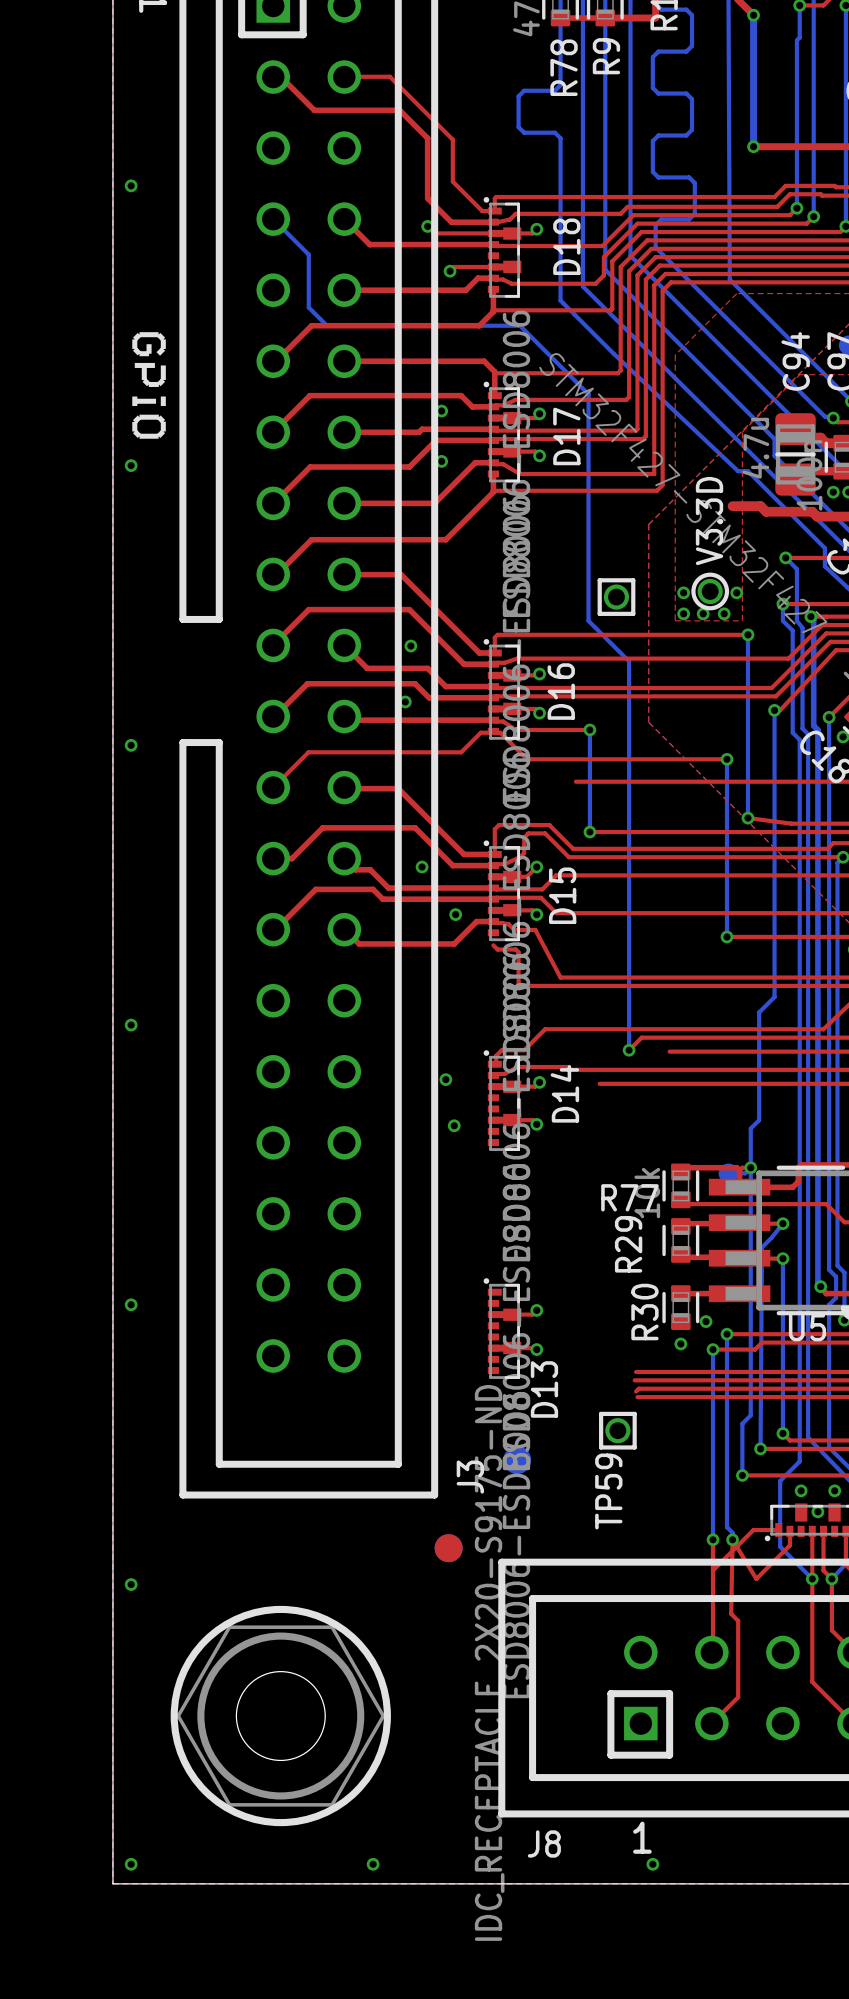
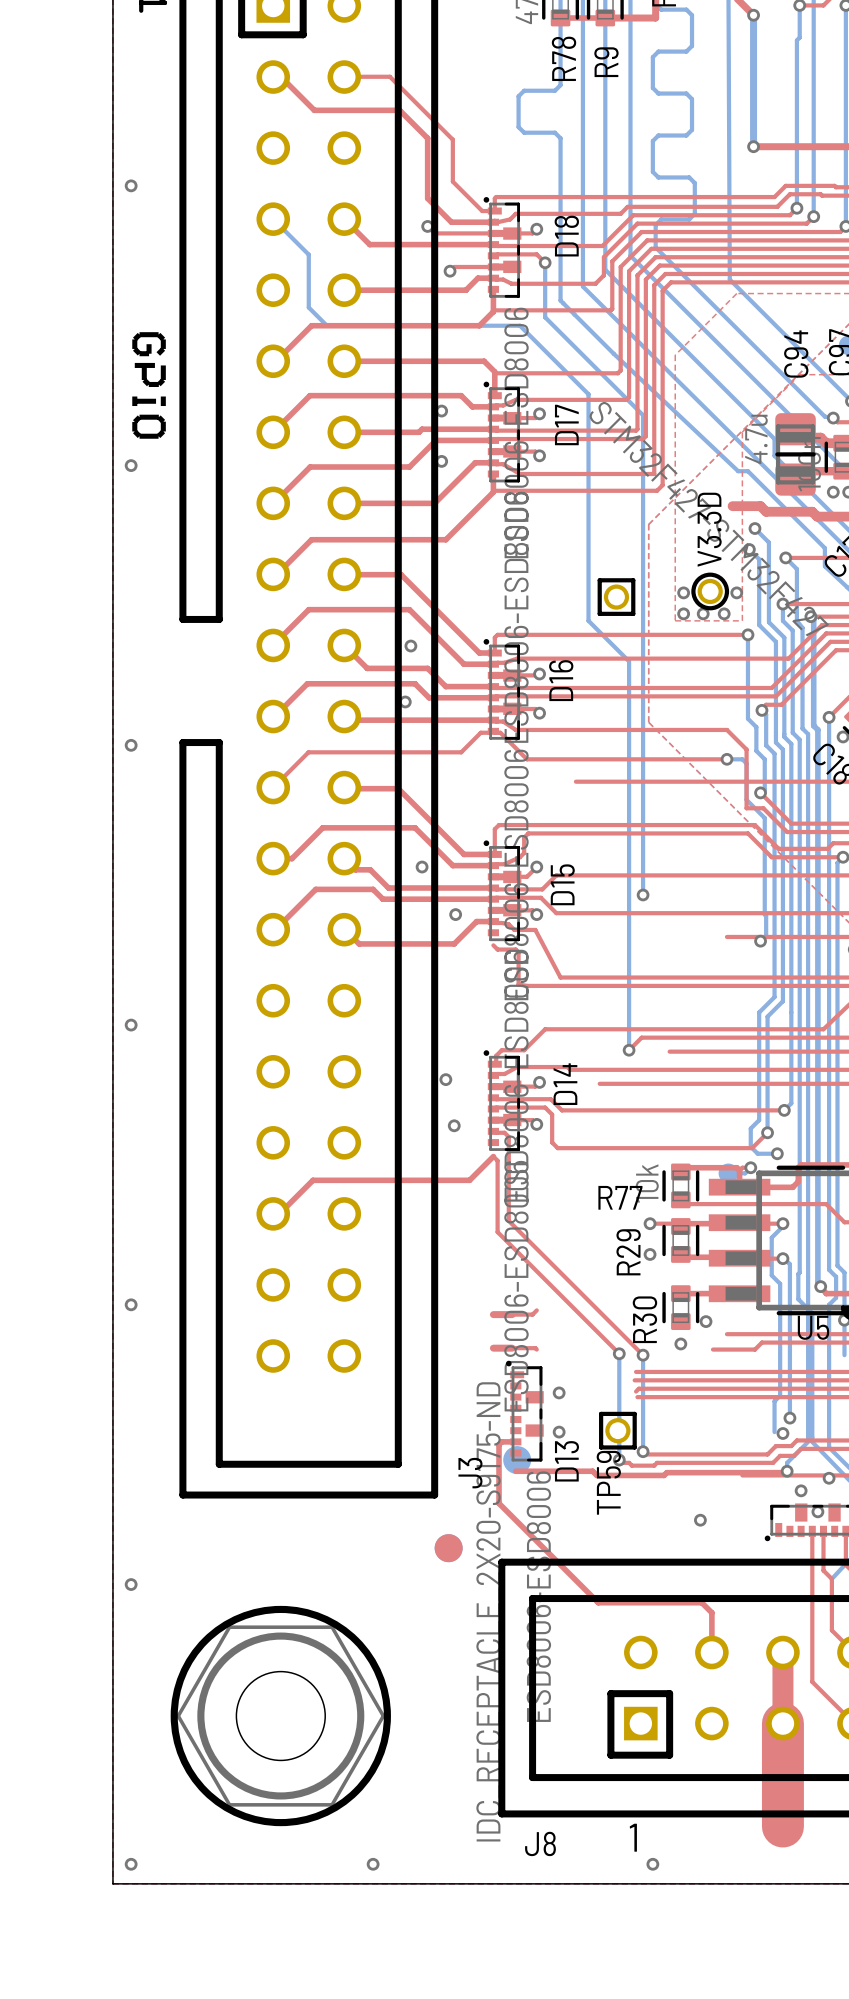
top track: none -> (496, 255) (536, 254) (545, 262)
bottom track: none -> (545, 262) (545, 317) (643, 415) (643, 894)
via: none -> (545, 262)
bottom track: none -> (754, 528) (768, 542) (768, 622) (784, 637) (784, 736) (791, 743) (791, 1103) (784, 1110)
via: none -> (754, 528)
bottom track: none -> (749, 549) (759, 559) (759, 625) (775, 641) (775, 742) (782, 749) (782, 1001) (767, 1016) (767, 1132)
via: none -> (749, 549)
top track: (836, 650) (780, 710) (774, 710) -> (836, 650) (781, 704) (766, 704) (761, 710)
bottom track: (774, 710) (774, 753) -> (761, 710) (766, 714) (766, 745) (774, 753)
via position: (774, 710) -> (761, 710)
bottom track: (747, 718) (747, 818) -> (747, 718) (756, 727) (756, 750) (764, 759) (764, 790) (760, 792)
bottom track: (589, 729) (589, 832) -> none
via: (589, 729) -> none
bottom track: (726, 759) (726, 936) -> (726, 759) (742, 759) (746, 763) (746, 799) (764, 818) (766, 935) (760, 941)
top track: (747, 818) (791, 823) -> (760, 792) (791, 823)
via position: (747, 818) -> (760, 792)
top track: (549, 825) (573, 848) (778, 848) -> (549, 825) (754, 825) (778, 848)
top track: (589, 832) (787, 832) -> (589, 729) (726, 729) (746, 749) (746, 808) (763, 808) (787, 832)
via position: (589, 832) -> (643, 894)
top track: (545, 833) (568, 857) (771, 857) -> (545, 833) (747, 833) (771, 857)
via position: (726, 936) -> (760, 941)
top track: none -> (494, 1097) (550, 1099) (561, 1110) (784, 1110)
top track: none -> (494, 1108) (545, 1107) (552, 1114) (552, 1142) (557, 1148) (752, 1148) (767, 1132)
via: none -> (784, 1110)
top track: none -> (494, 1131) (504, 1132) (508, 1136) (508, 1220) (643, 1355)
via: none -> (767, 1132)
bottom track: (750, 1146) (750, 1415) (742, 1423) (742, 1475) -> (750, 1146) (757, 1153) (777, 1153)
via: none -> (777, 1153)
top track: none -> (279, 1213) (312, 1180) (469, 1180) (493, 1156) (497, 1160) (497, 1232) (619, 1353)
top track: none -> (650, 1223) (678, 1223)
via: none -> (650, 1223)
bottom track: (782, 1223) (761, 1247) (760, 1448) -> none
bottom track: none -> (785, 1223) (771, 1237) (771, 1275) (780, 1283) (780, 1395) (774, 1401) (774, 1432)
via: none -> (650, 1254)
bottom track: (782, 1258) (782, 1433) -> none
bottom track: none -> (785, 1260) (789, 1264) (789, 1418)
bottom track: (799, 1272) (799, 1461) (780, 1481) (780, 1546) (812, 1578) -> (799, 1272) (798, 1299) (812, 1313) (812, 1437) (787, 1462) (787, 1471)
via: (536, 1310) -> none
bottom track: none -> (844, 1320) (844, 1355)
D13 position: (502, 1328) -> (524, 1411)
bottom track: (726, 1334) (726, 1527) (732, 1532) (732, 1539) -> none
via: (726, 1334) -> none
via: (536, 1349) -> none
bottom track: (713, 1349) (713, 1539) -> none
via: (713, 1349) -> none
bottom track: none -> (619, 1353) (619, 1460)
via: none -> (619, 1353)
bottom track: none -> (643, 1355) (643, 1451)
via: none -> (643, 1355)
via: none -> (559, 1392)
via: none -> (789, 1418)
via: none -> (559, 1432)
top track: (782, 1433) (789, 1440) (796, 1440) -> (643, 1451) (645, 1454) (767, 1454) (775, 1446) (791, 1446) (796, 1440)
top track: (760, 1448) (801, 1448) -> (619, 1460) (631, 1465) (654, 1465) (657, 1462) (773, 1462) (780, 1455) (794, 1455) (801, 1448)
via: (760, 1448) -> none
via: none -> (643, 1451)
via: none -> (619, 1460)
top track: none -> (515, 1471) (592, 1471) (596, 1475) (787, 1471)
via: none -> (787, 1471)
via: (742, 1475) -> none
via position: (834, 1490) -> (829, 1478)
via: none -> (700, 1520)
top track: (778, 1529) (753, 1529) (713, 1570) -> none
top track: (789, 1531) (789, 1545) (756, 1578) (732, 1539) (731, 1613) (738, 1620) (738, 1697) (711, 1723) -> none
top track: (713, 1539) (711, 1652) -> (515, 1441) (501, 1441) (499, 1444) (499, 1503) (598, 1602) (701, 1602) (711, 1612) (711, 1652)
via: (713, 1539) -> none
via: (732, 1539) -> none
via: (812, 1578) -> none
via: (831, 1578) -> none
top track: none -> (782, 1652) (782, 1826)

